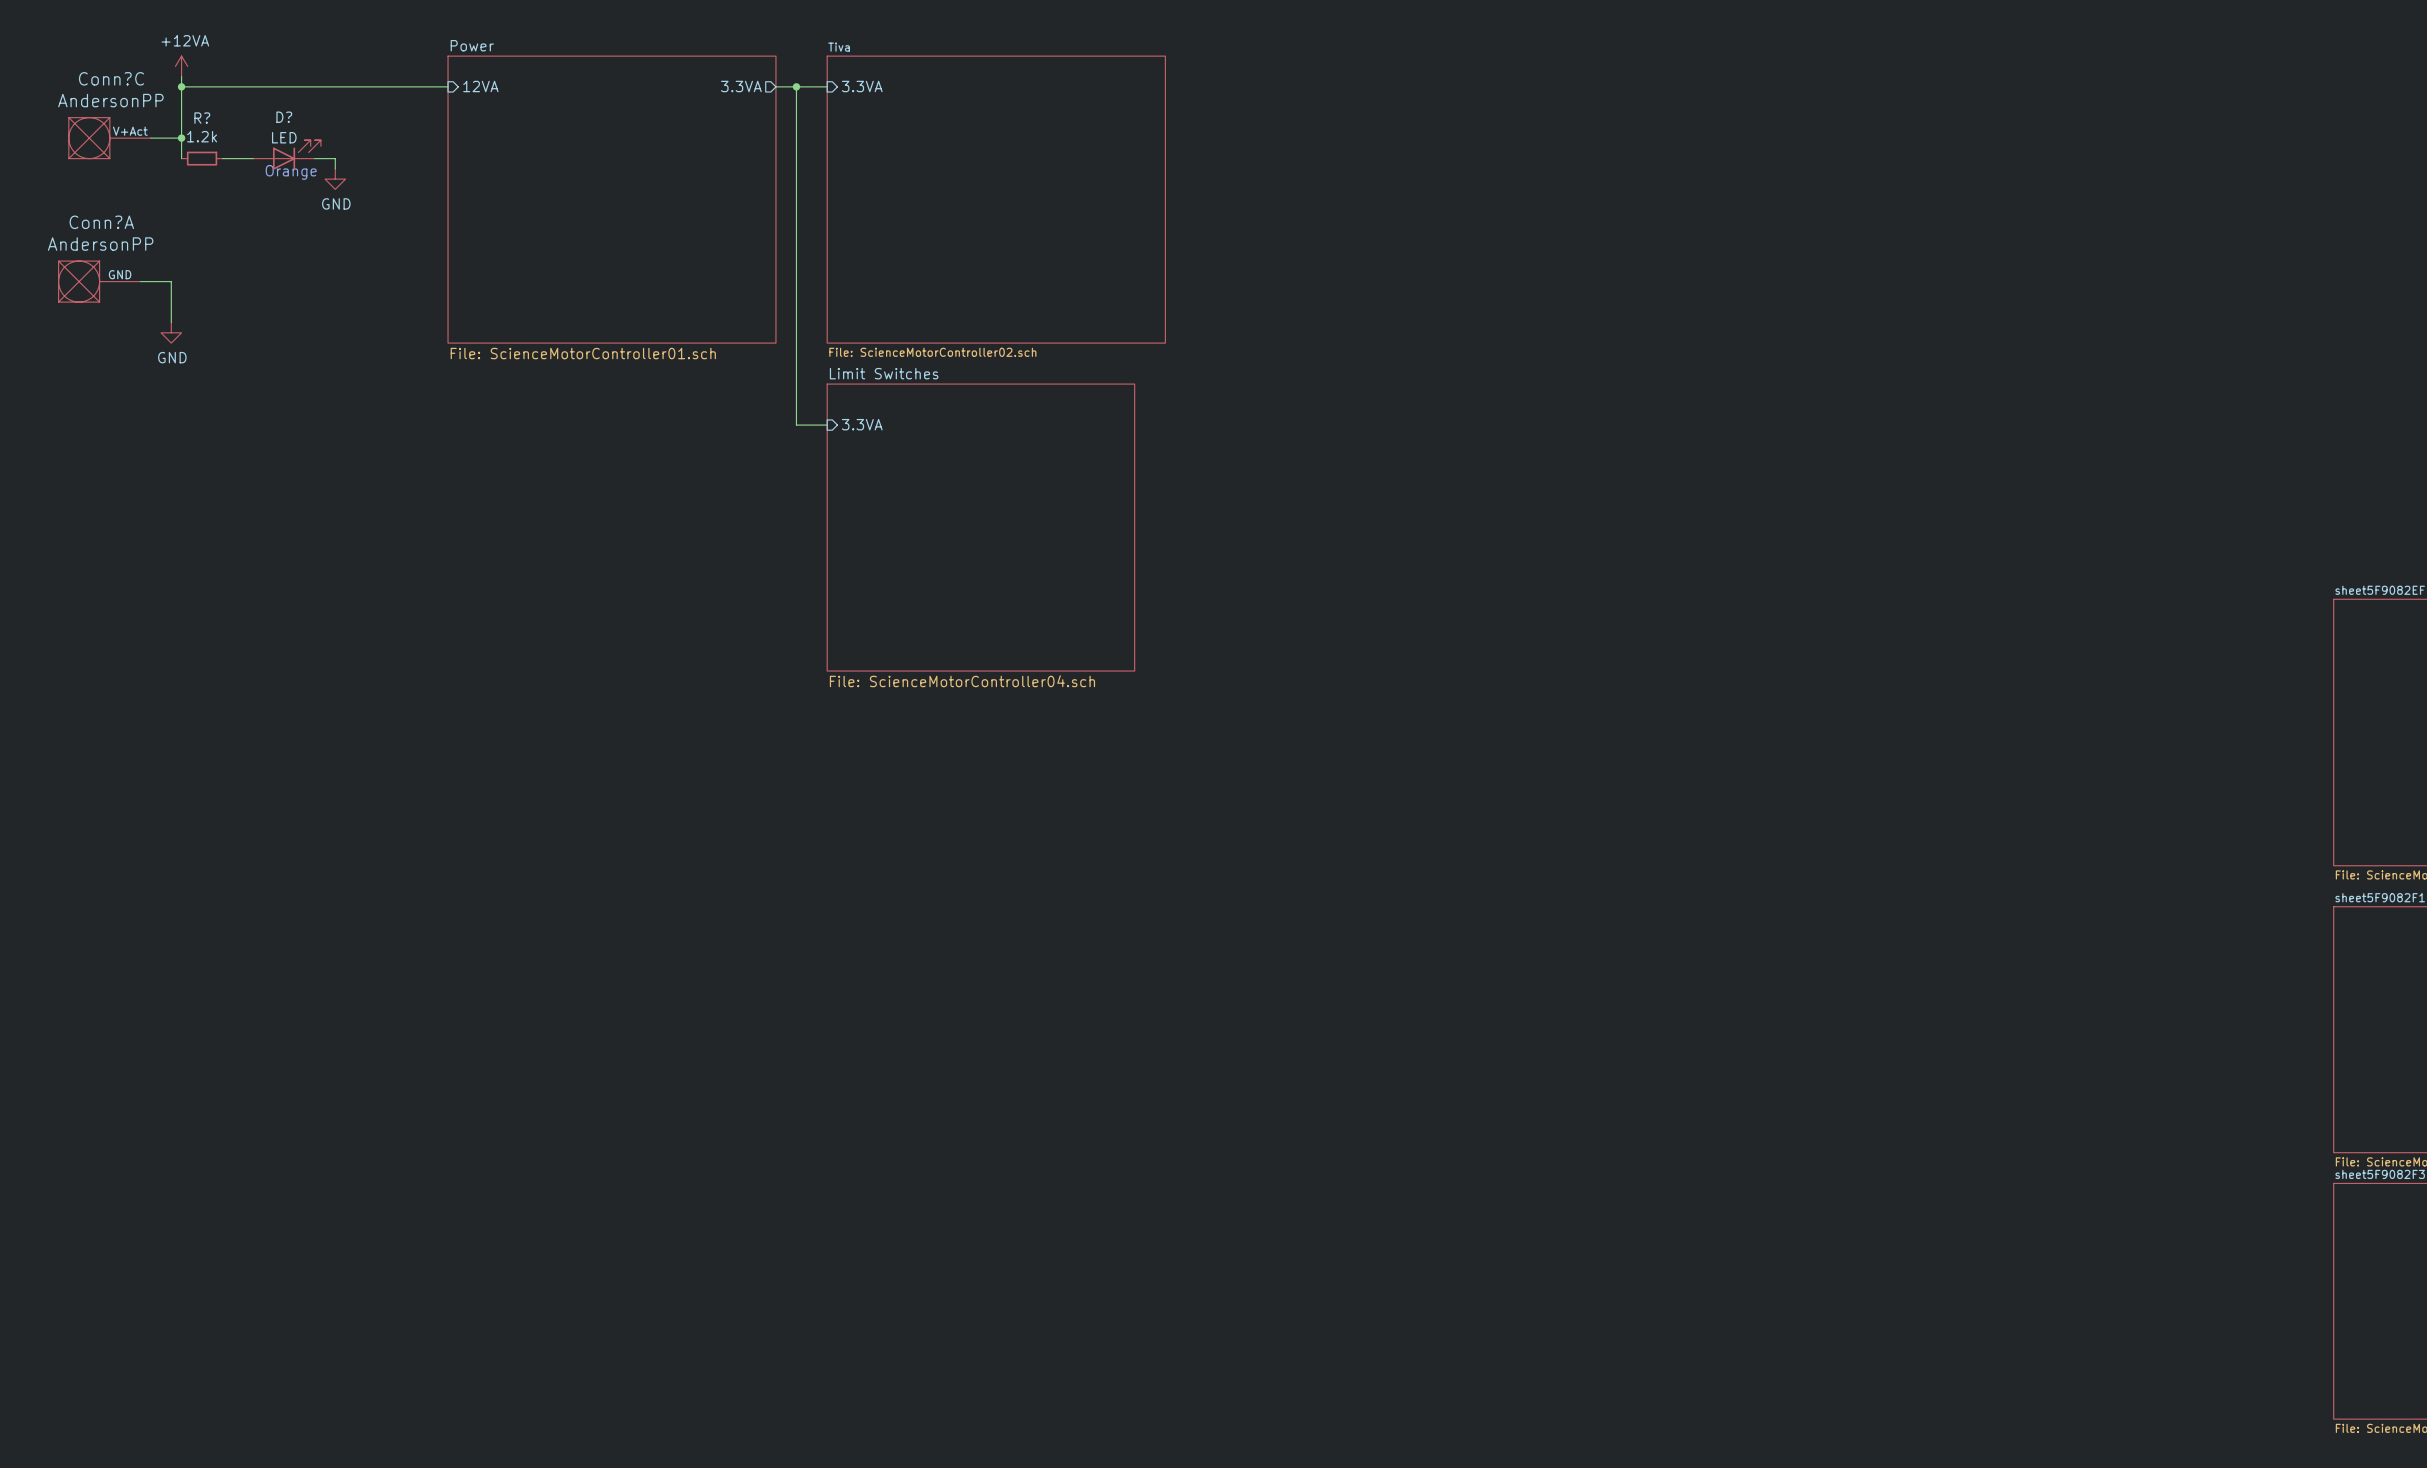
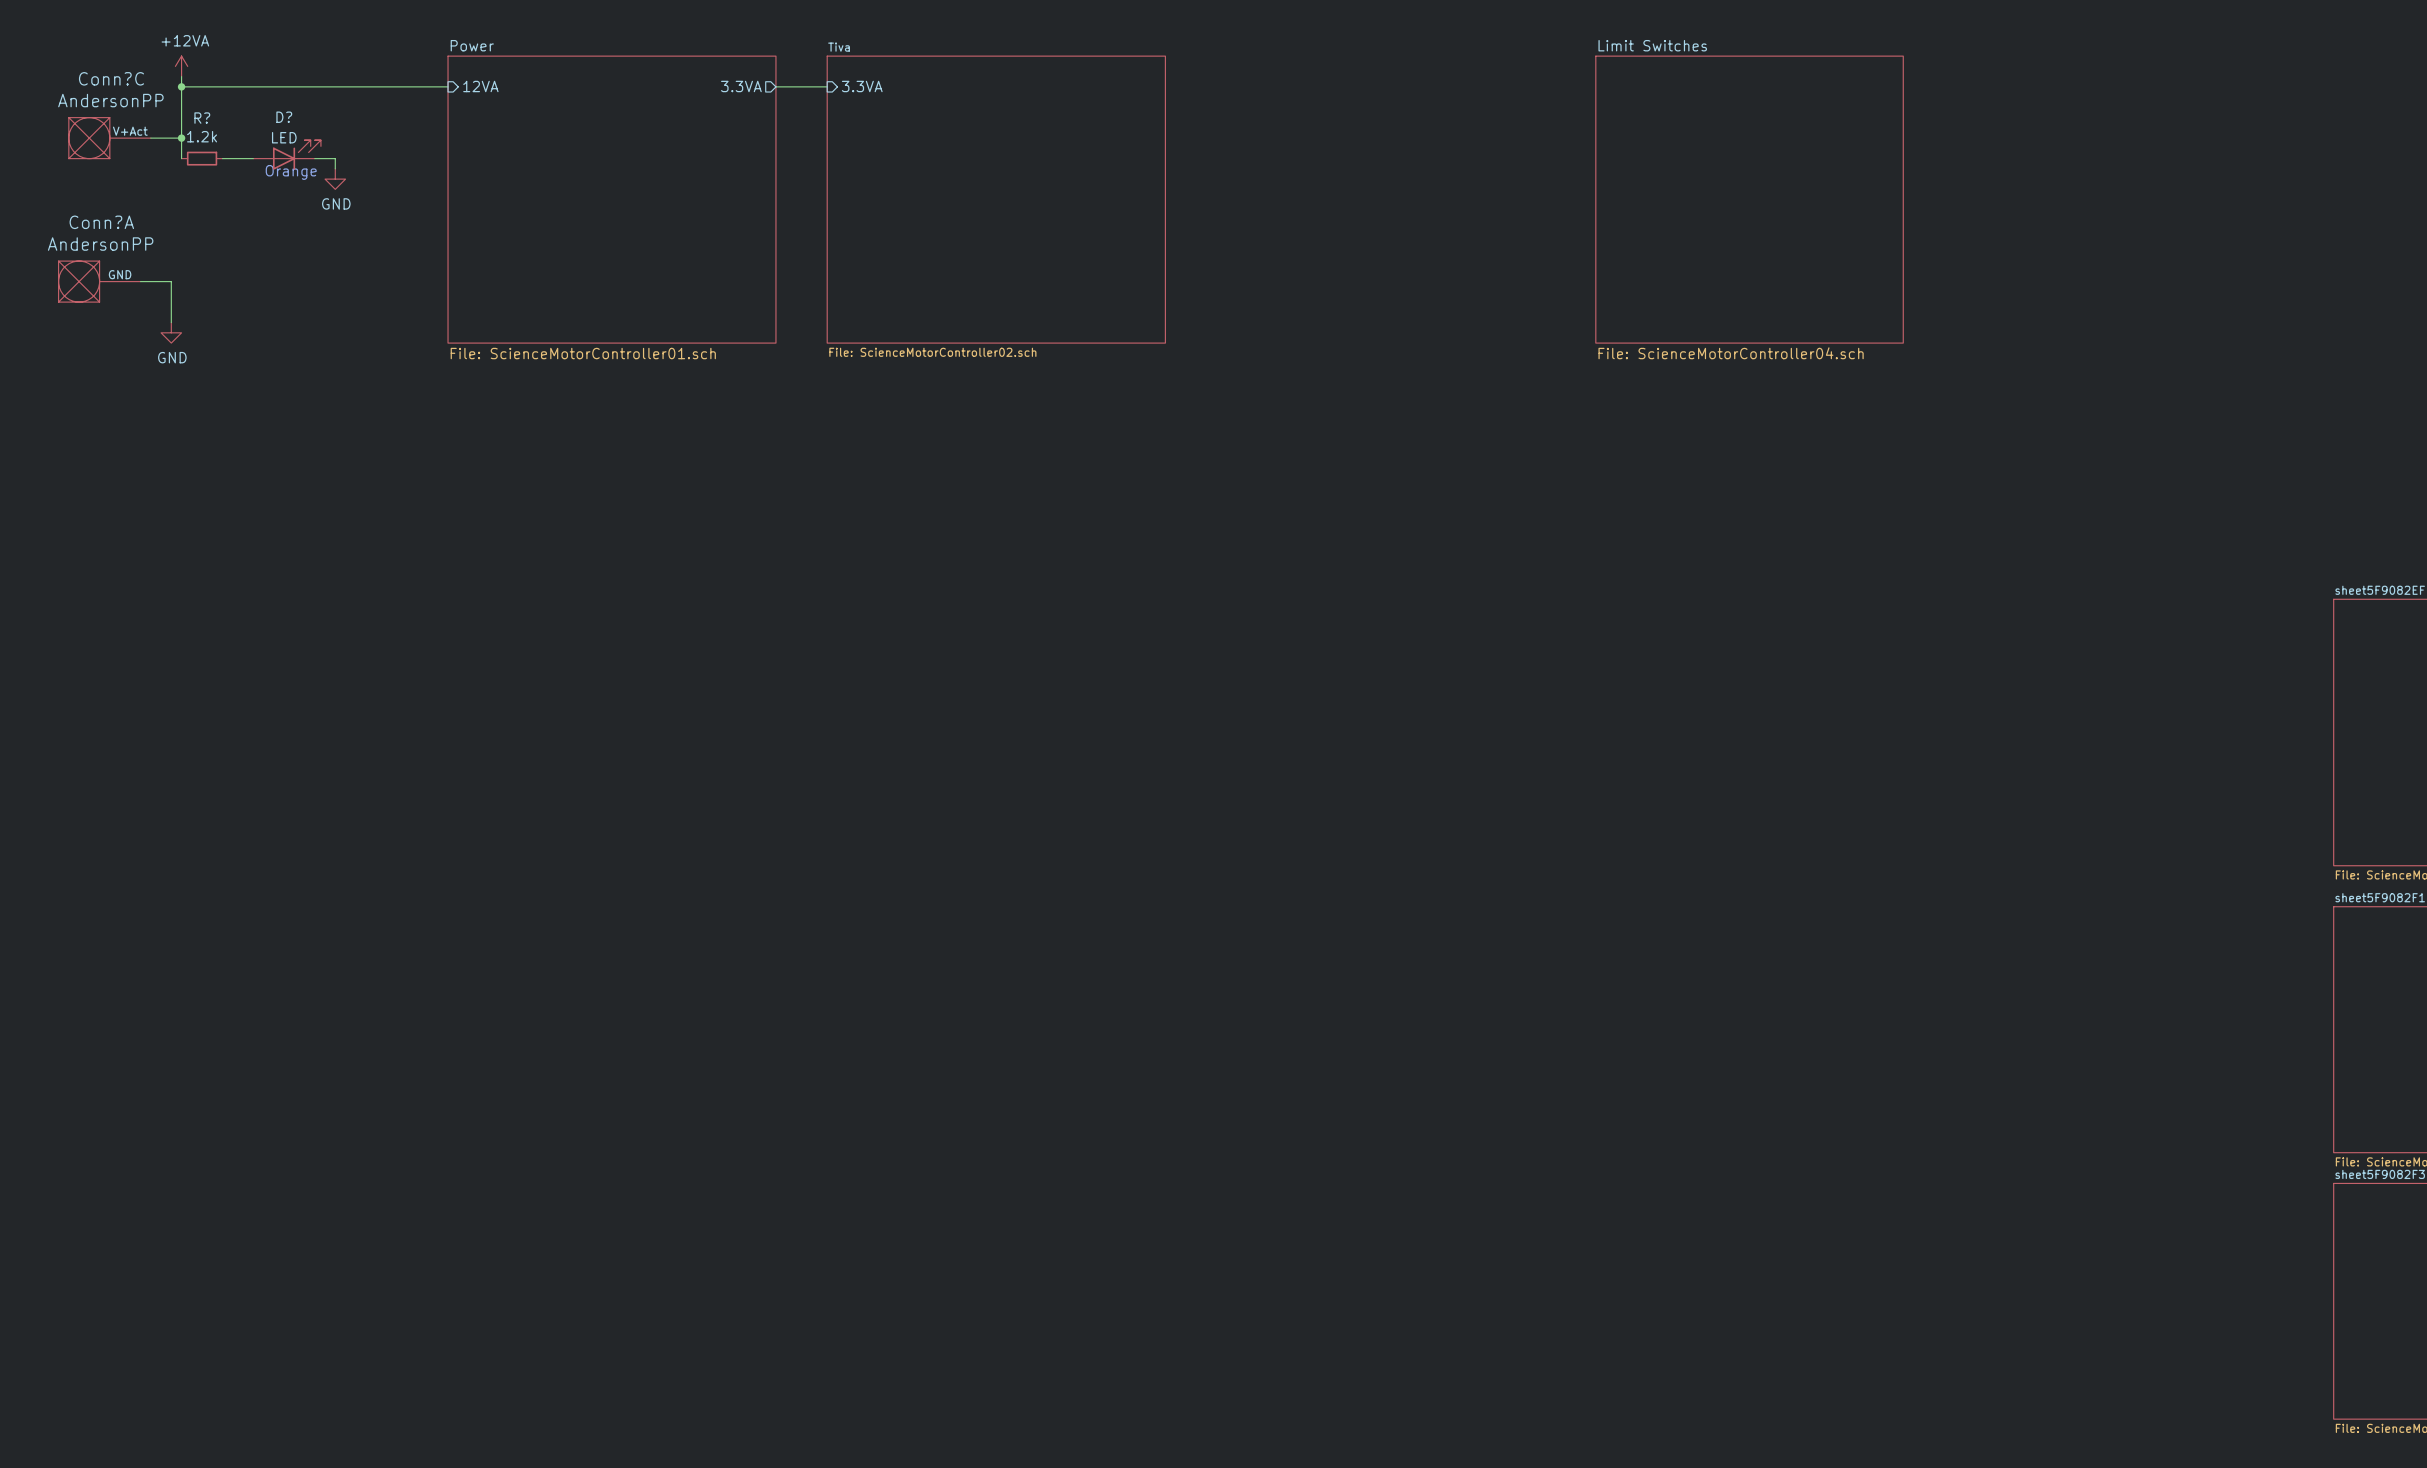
wire: (796, 86) (796, 425) (827, 425) -> none
junction: (796, 86) -> none
sheet Limit Switches: none -> File: ScienceMotorController04.sch (1749, 199)
sheet pin: 3.3VA (862, 424) -> none
sheet Limit Switches: File: ScienceMotorController04.sch (980, 527) -> none

